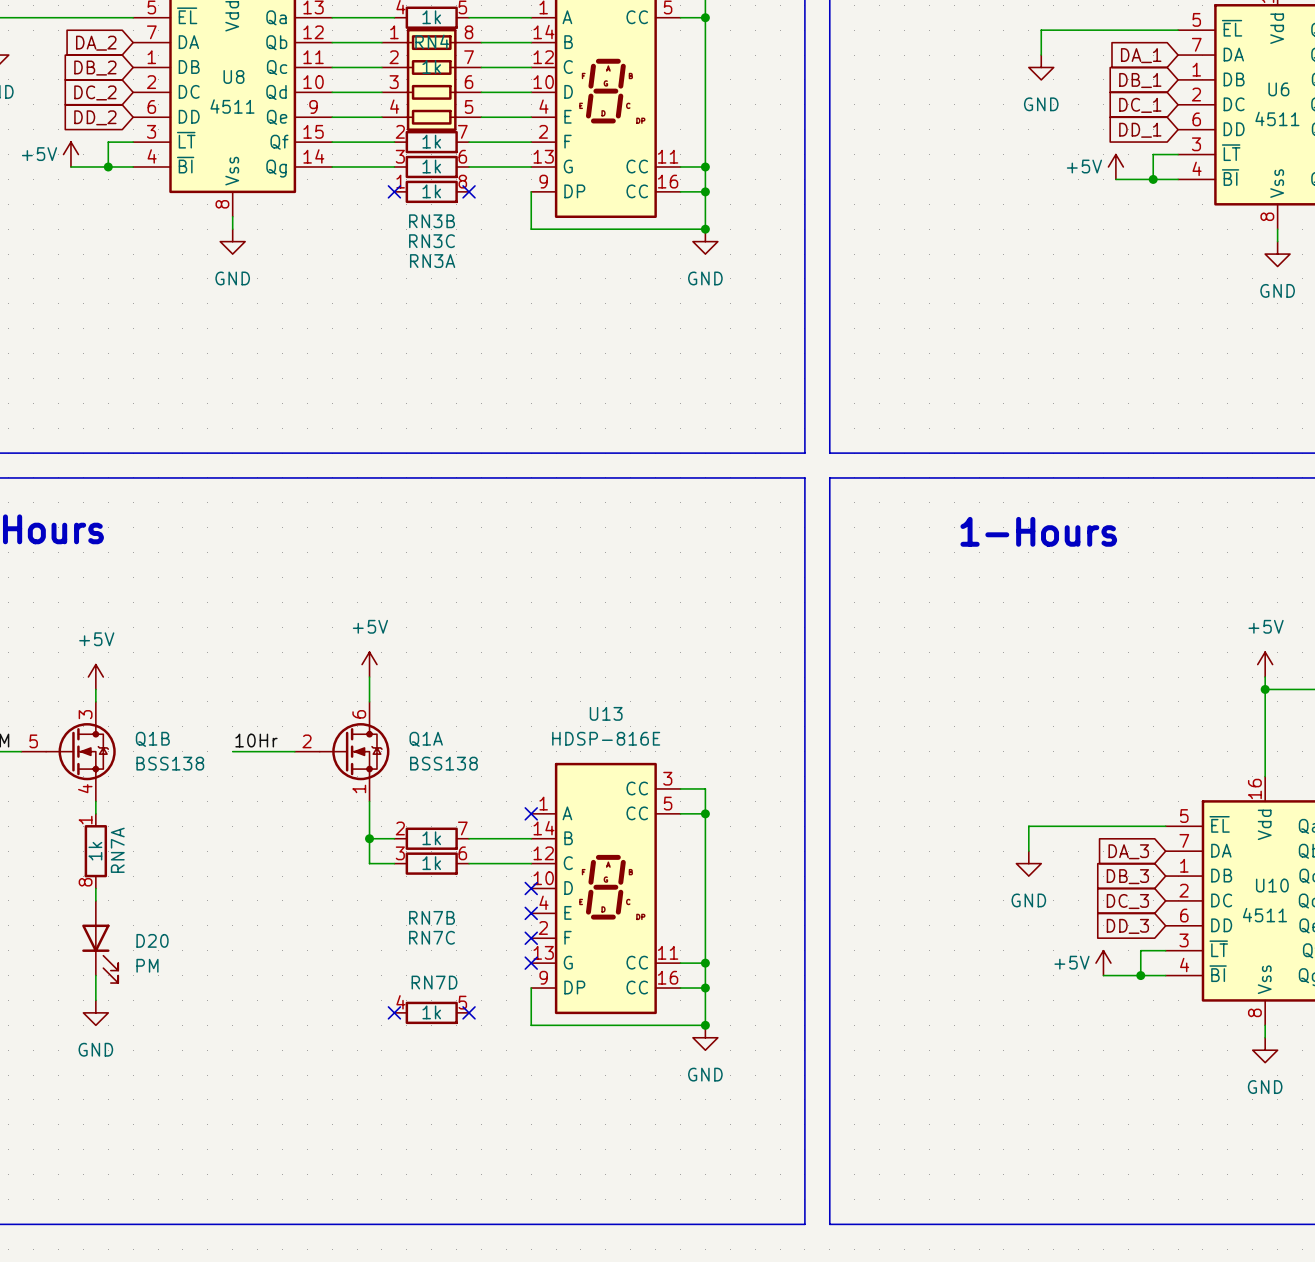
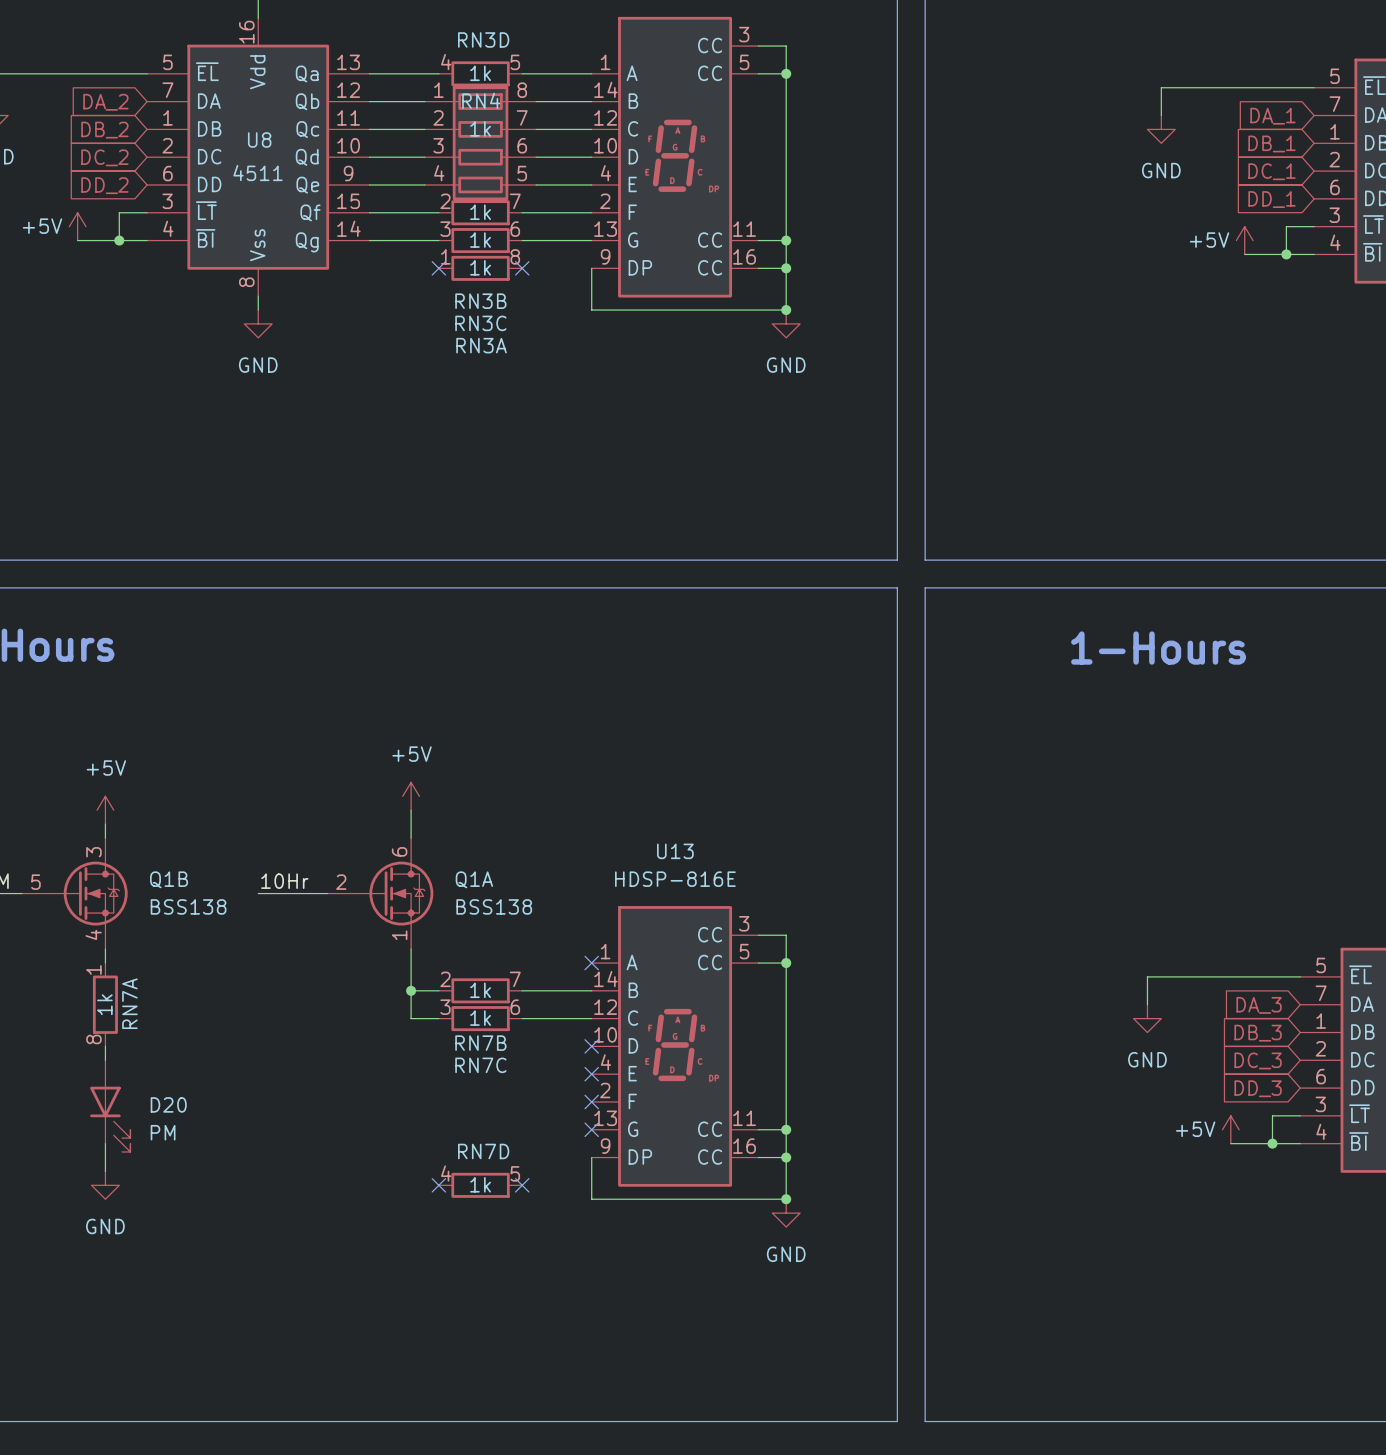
RN7B name position: RN7B (432, 917) -> RN7B (480, 1043)
RN7C name position: RN7C (432, 937) -> RN7C (480, 1065)

